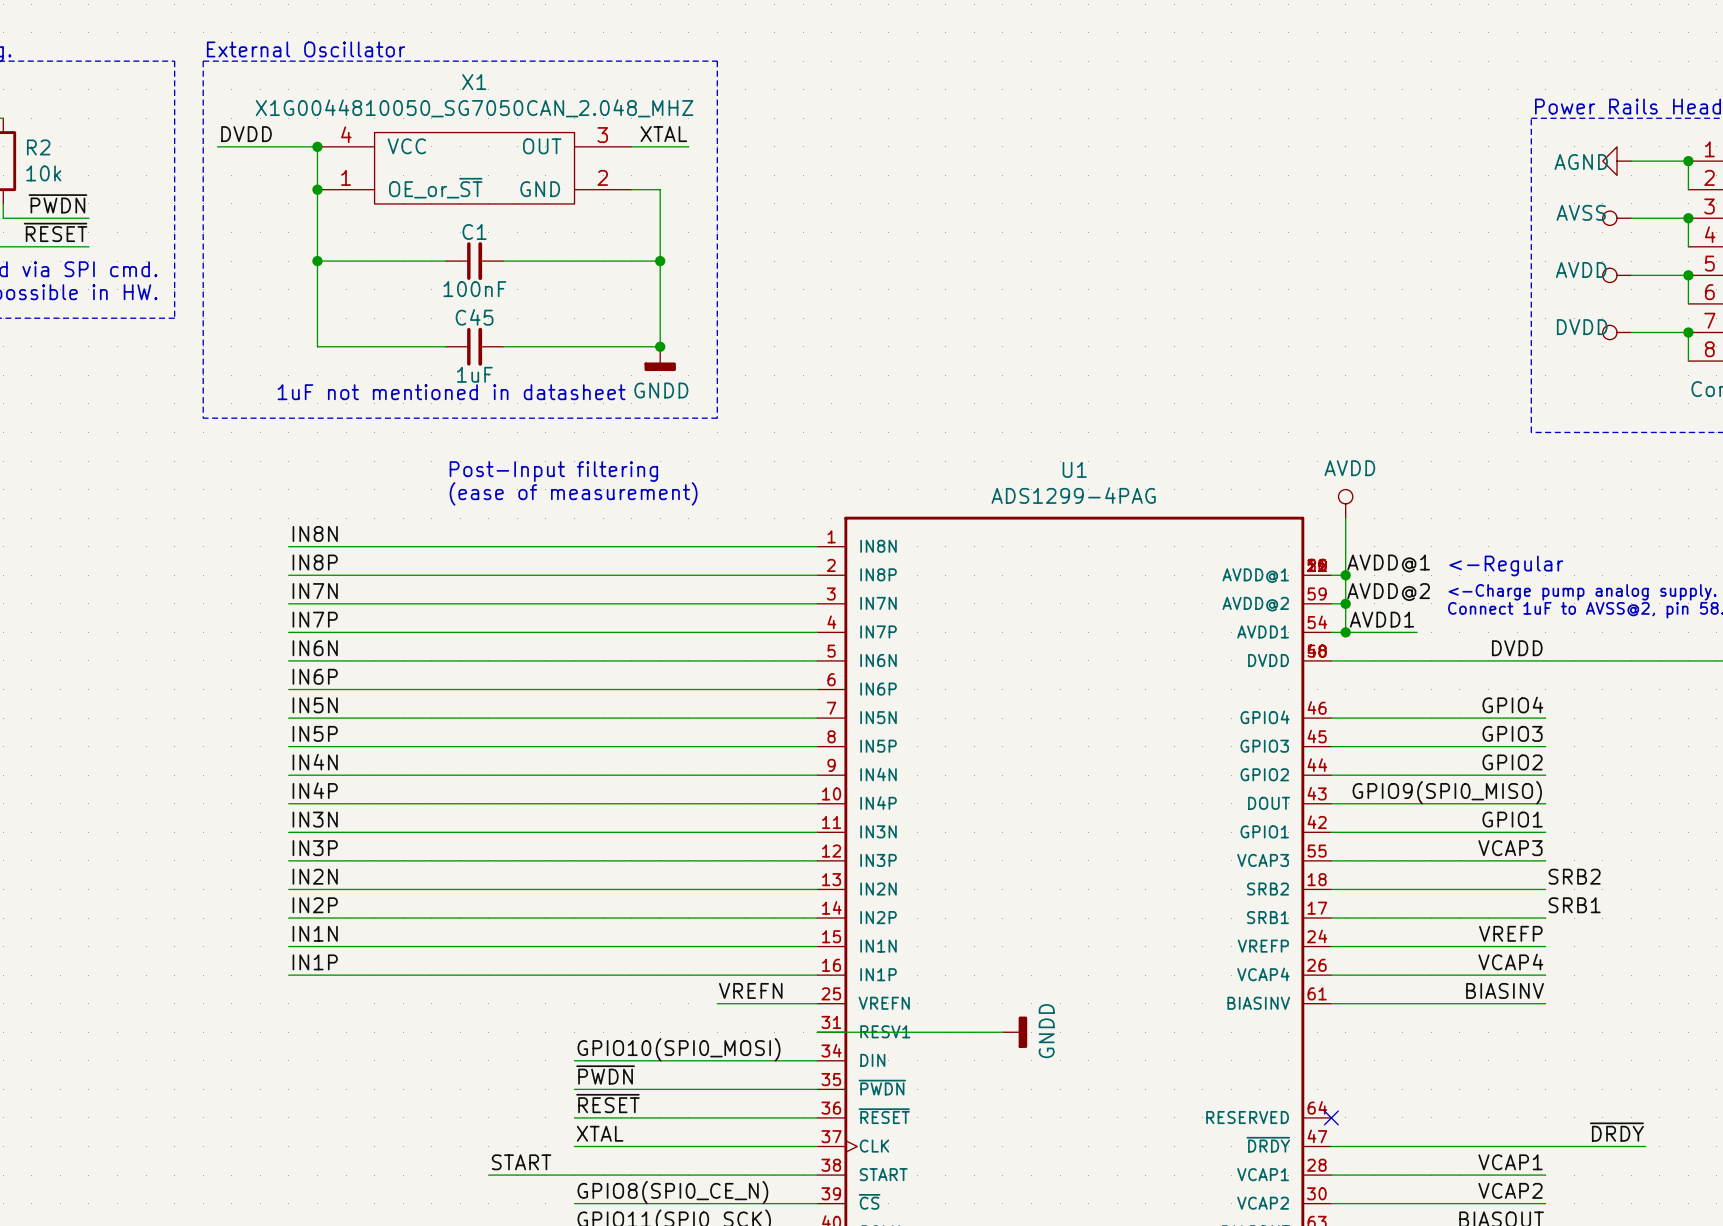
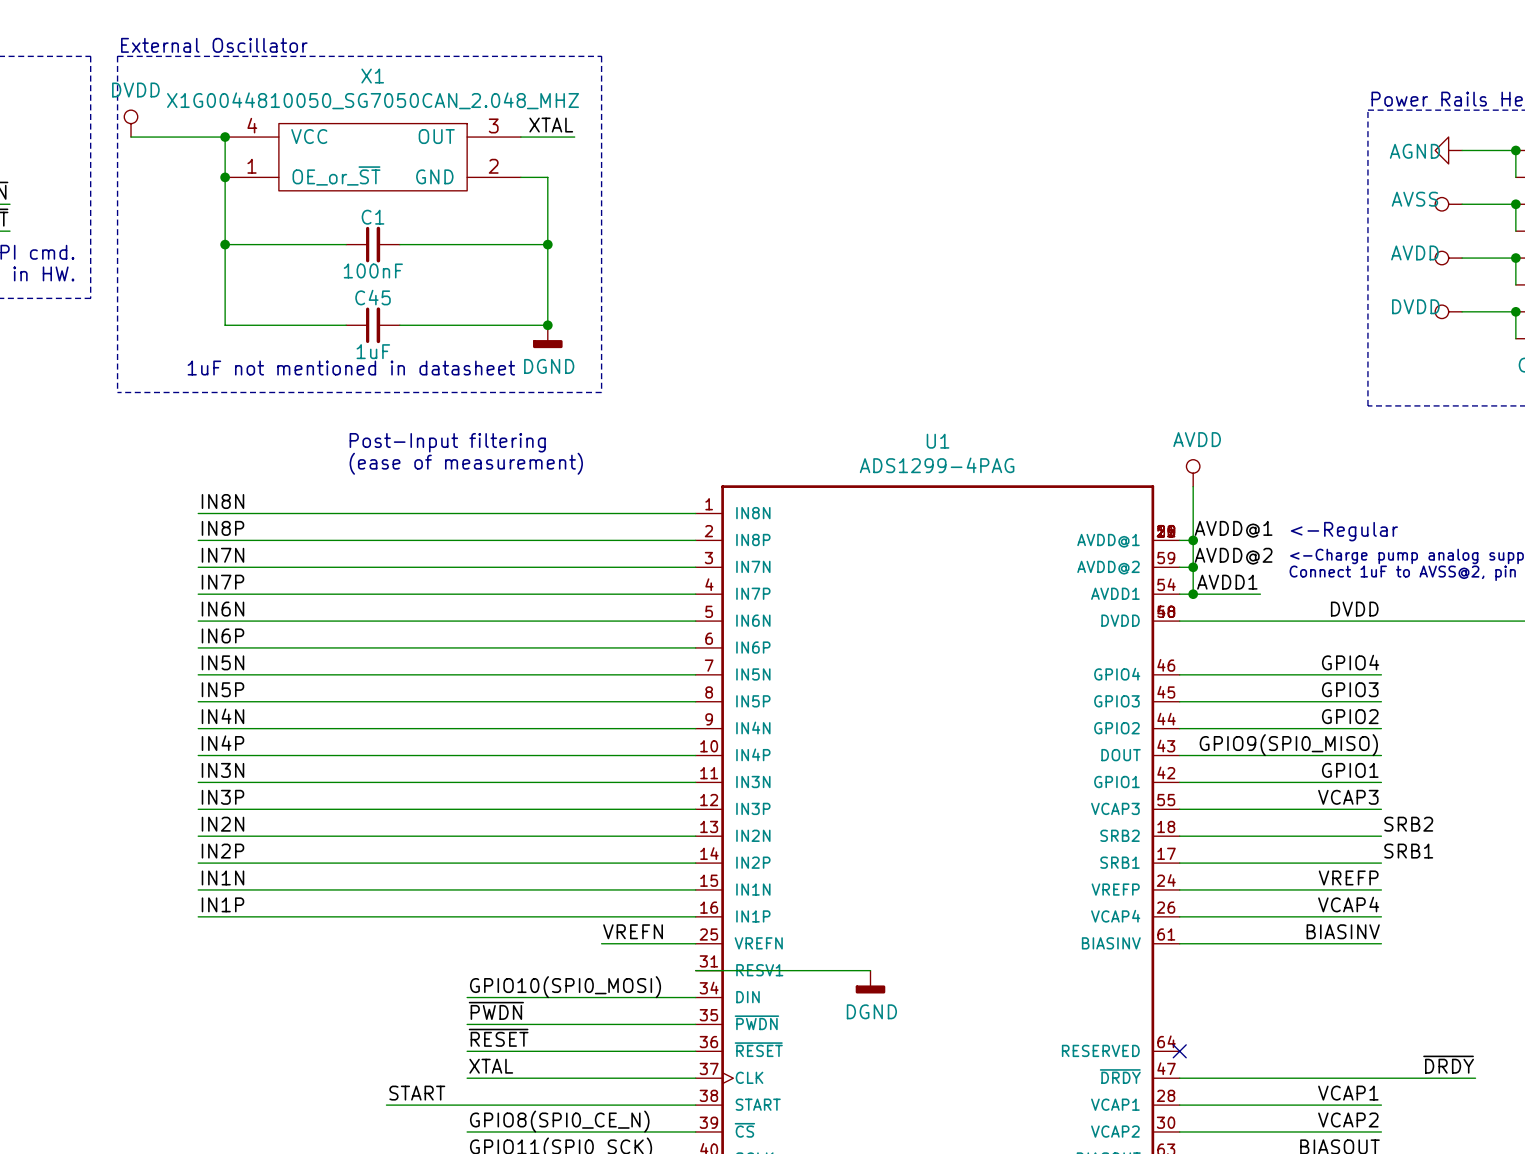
power symbol: none -> DVDD (131, 123)
label: DVDD (246, 134) -> none
power symbol: GNDD (660, 358) -> DGND (547, 336)
power symbol: GNDD (1015, 1032) -> none
power symbol: none -> DGND (870, 982)

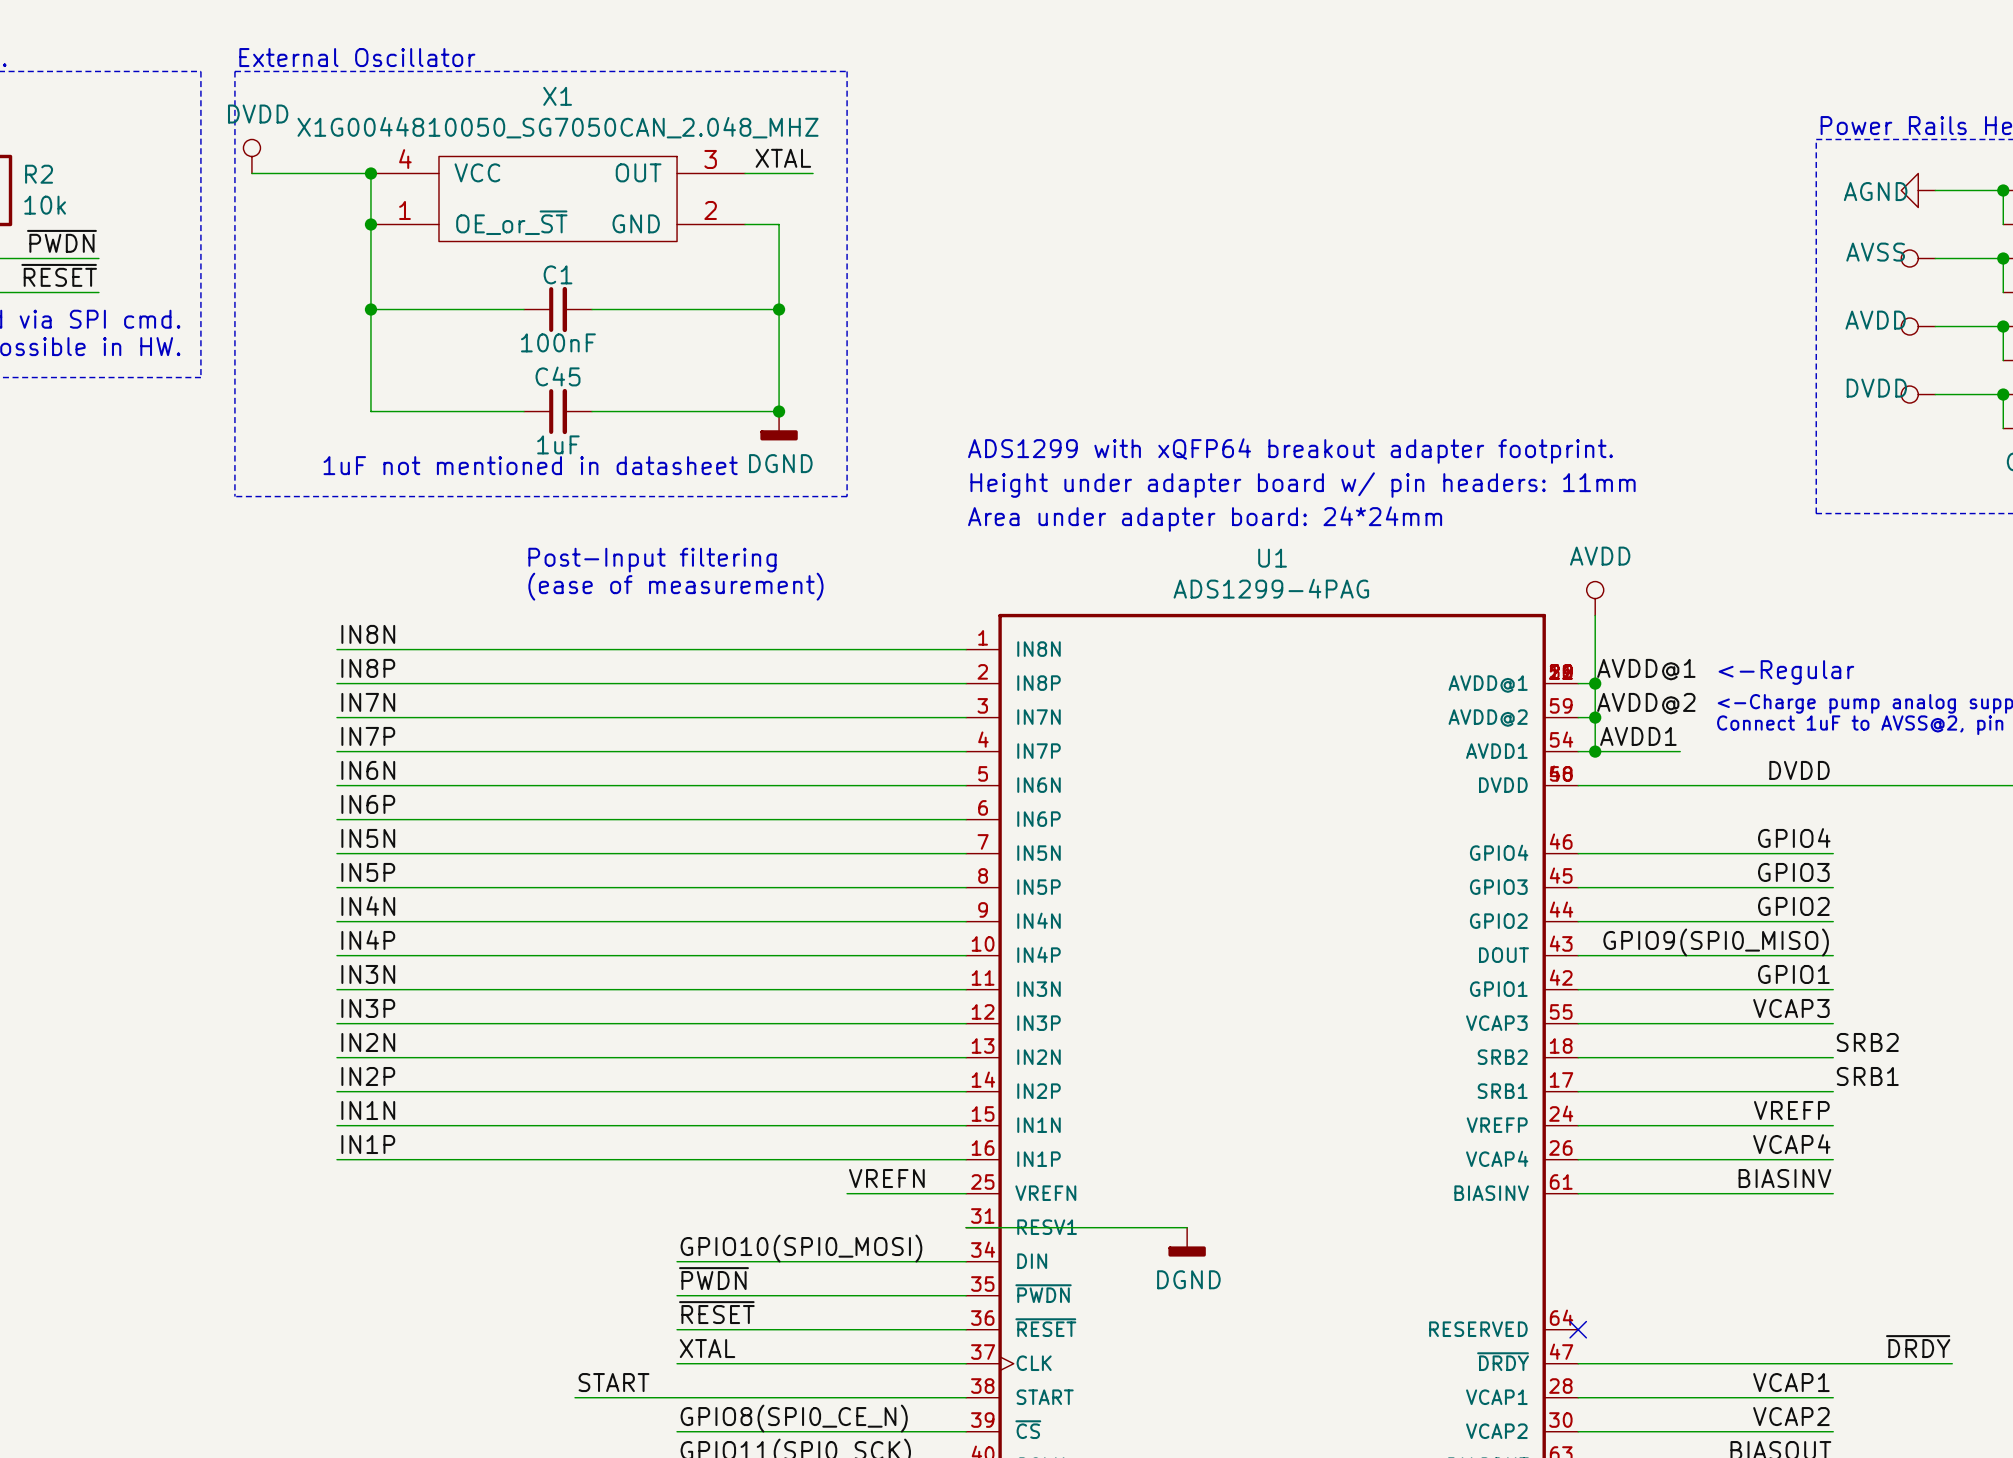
text: none -> ADS1299 with xQFP64 breakout adapter footprint. (1290, 451)
text: none -> Height under adapter board w/ pin headers: 11mm (1303, 485)
text: none -> Area under adapter board: 24*24mm (1205, 519)

